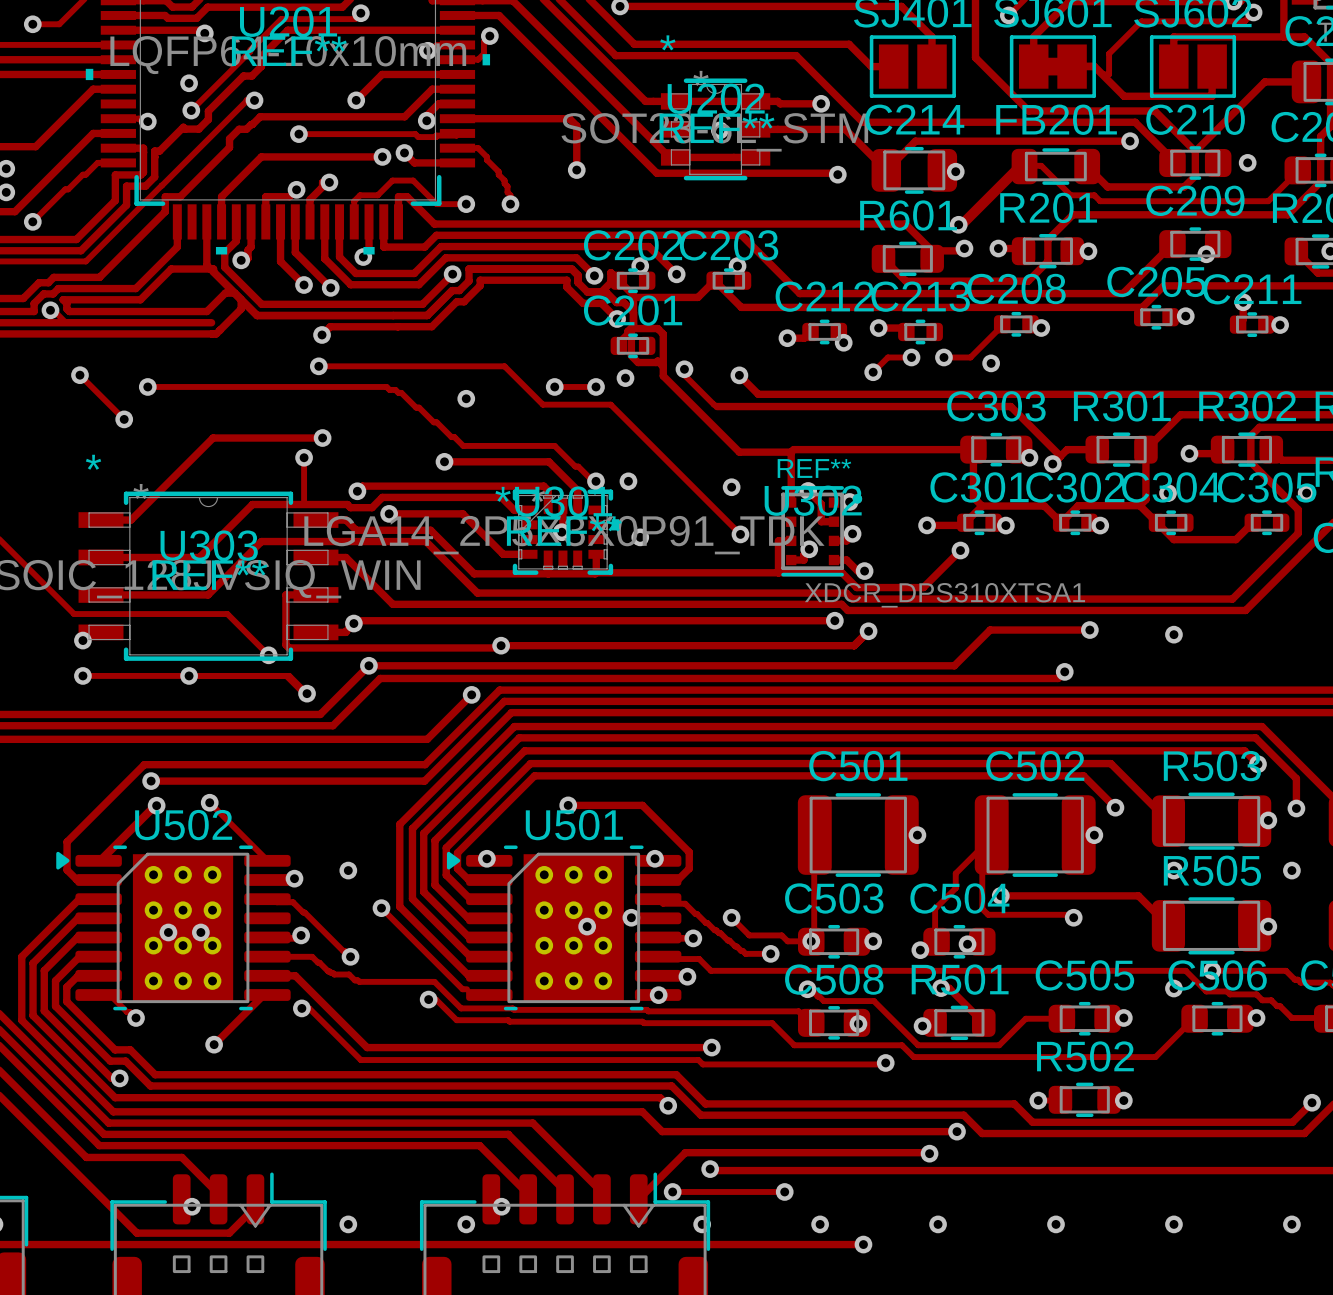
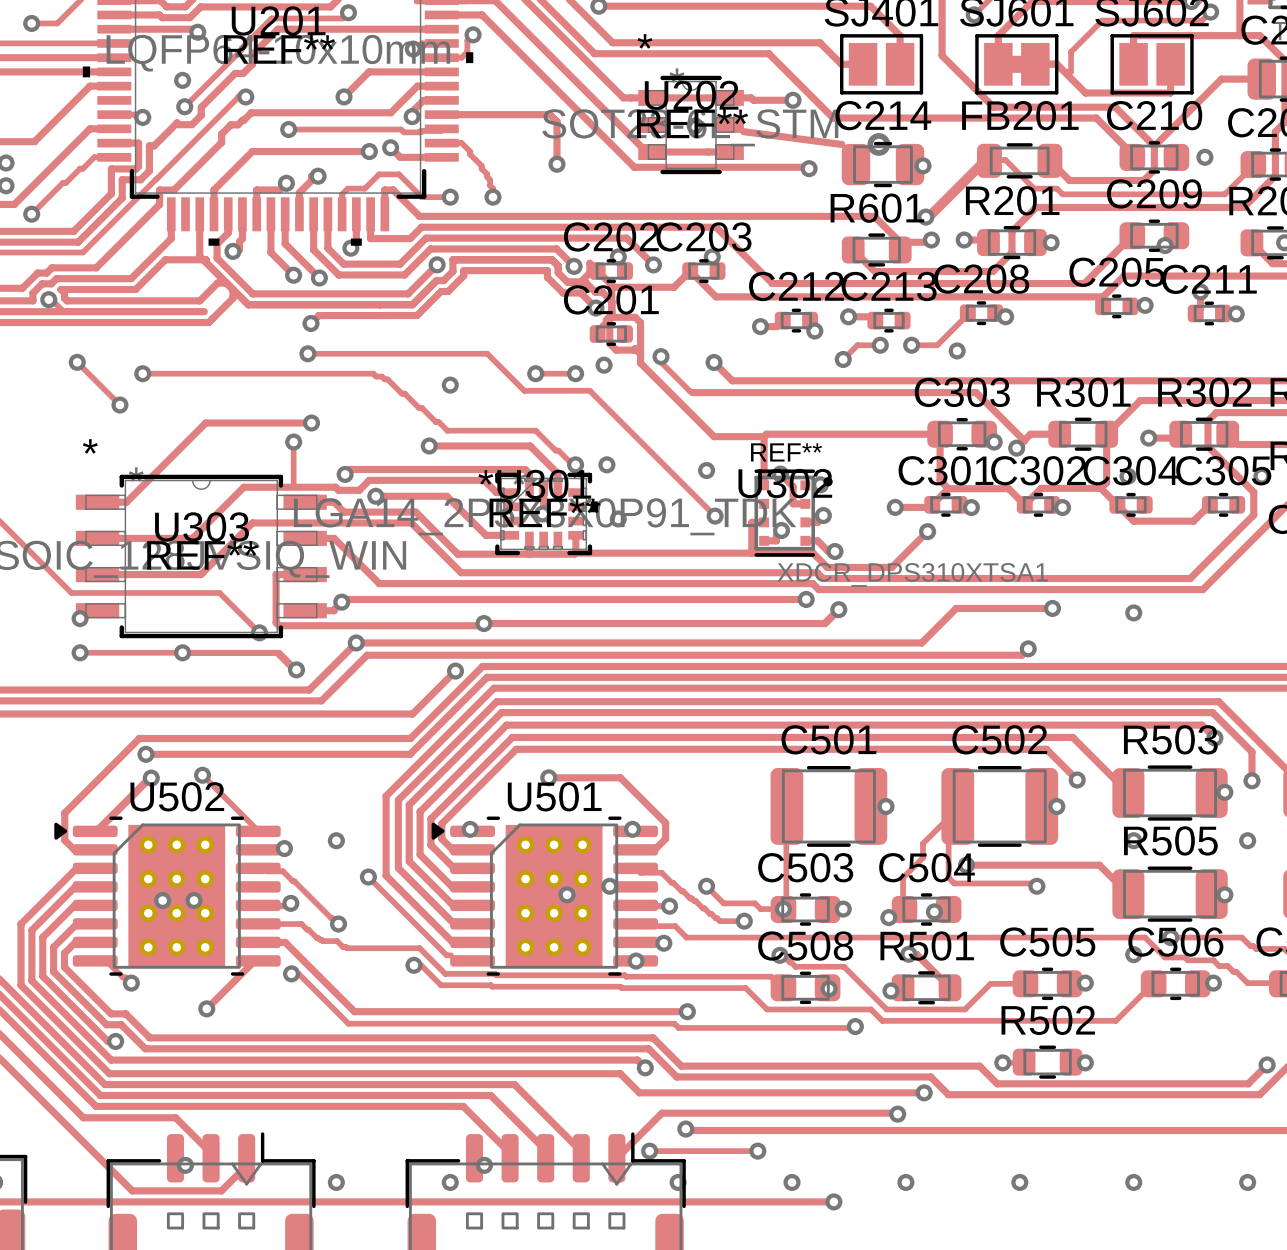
track: (755, 129) (845, 129) (886, 170) (915, 141) (1130, 141) -> none
track: none -> (743, 131) (841, 144)
via: (1130, 141) -> none
via: none -> (878, 144)

